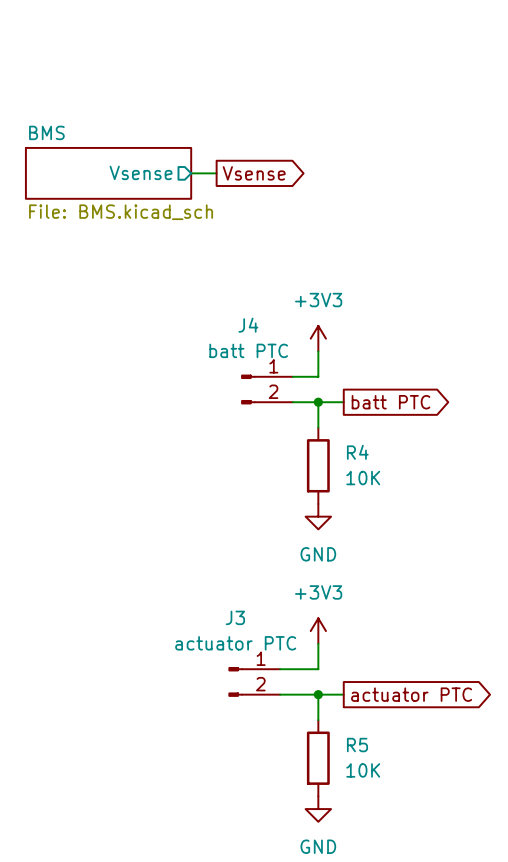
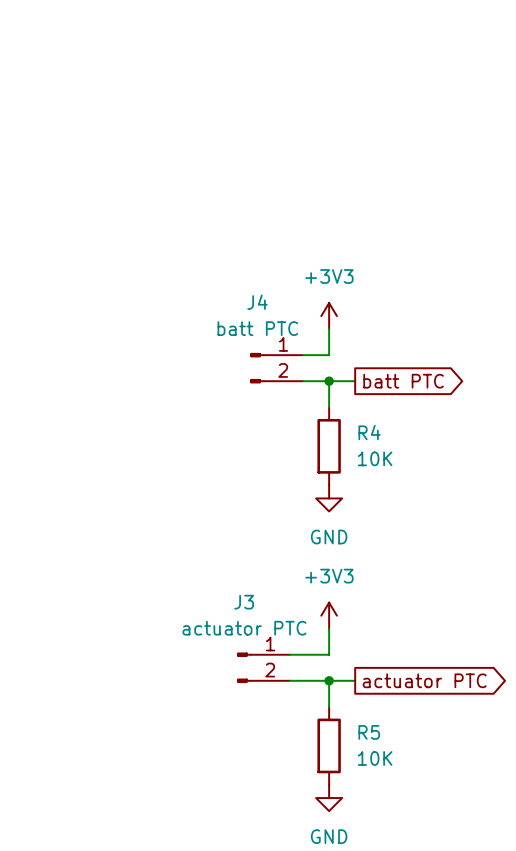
sheet pin: Vsense (141, 172) -> none
sheet BMS: File: BMS.kicad_sch (108, 173) -> none
wire: (191, 173) (216, 173) -> none
global label: Vsense (254, 173) -> none

